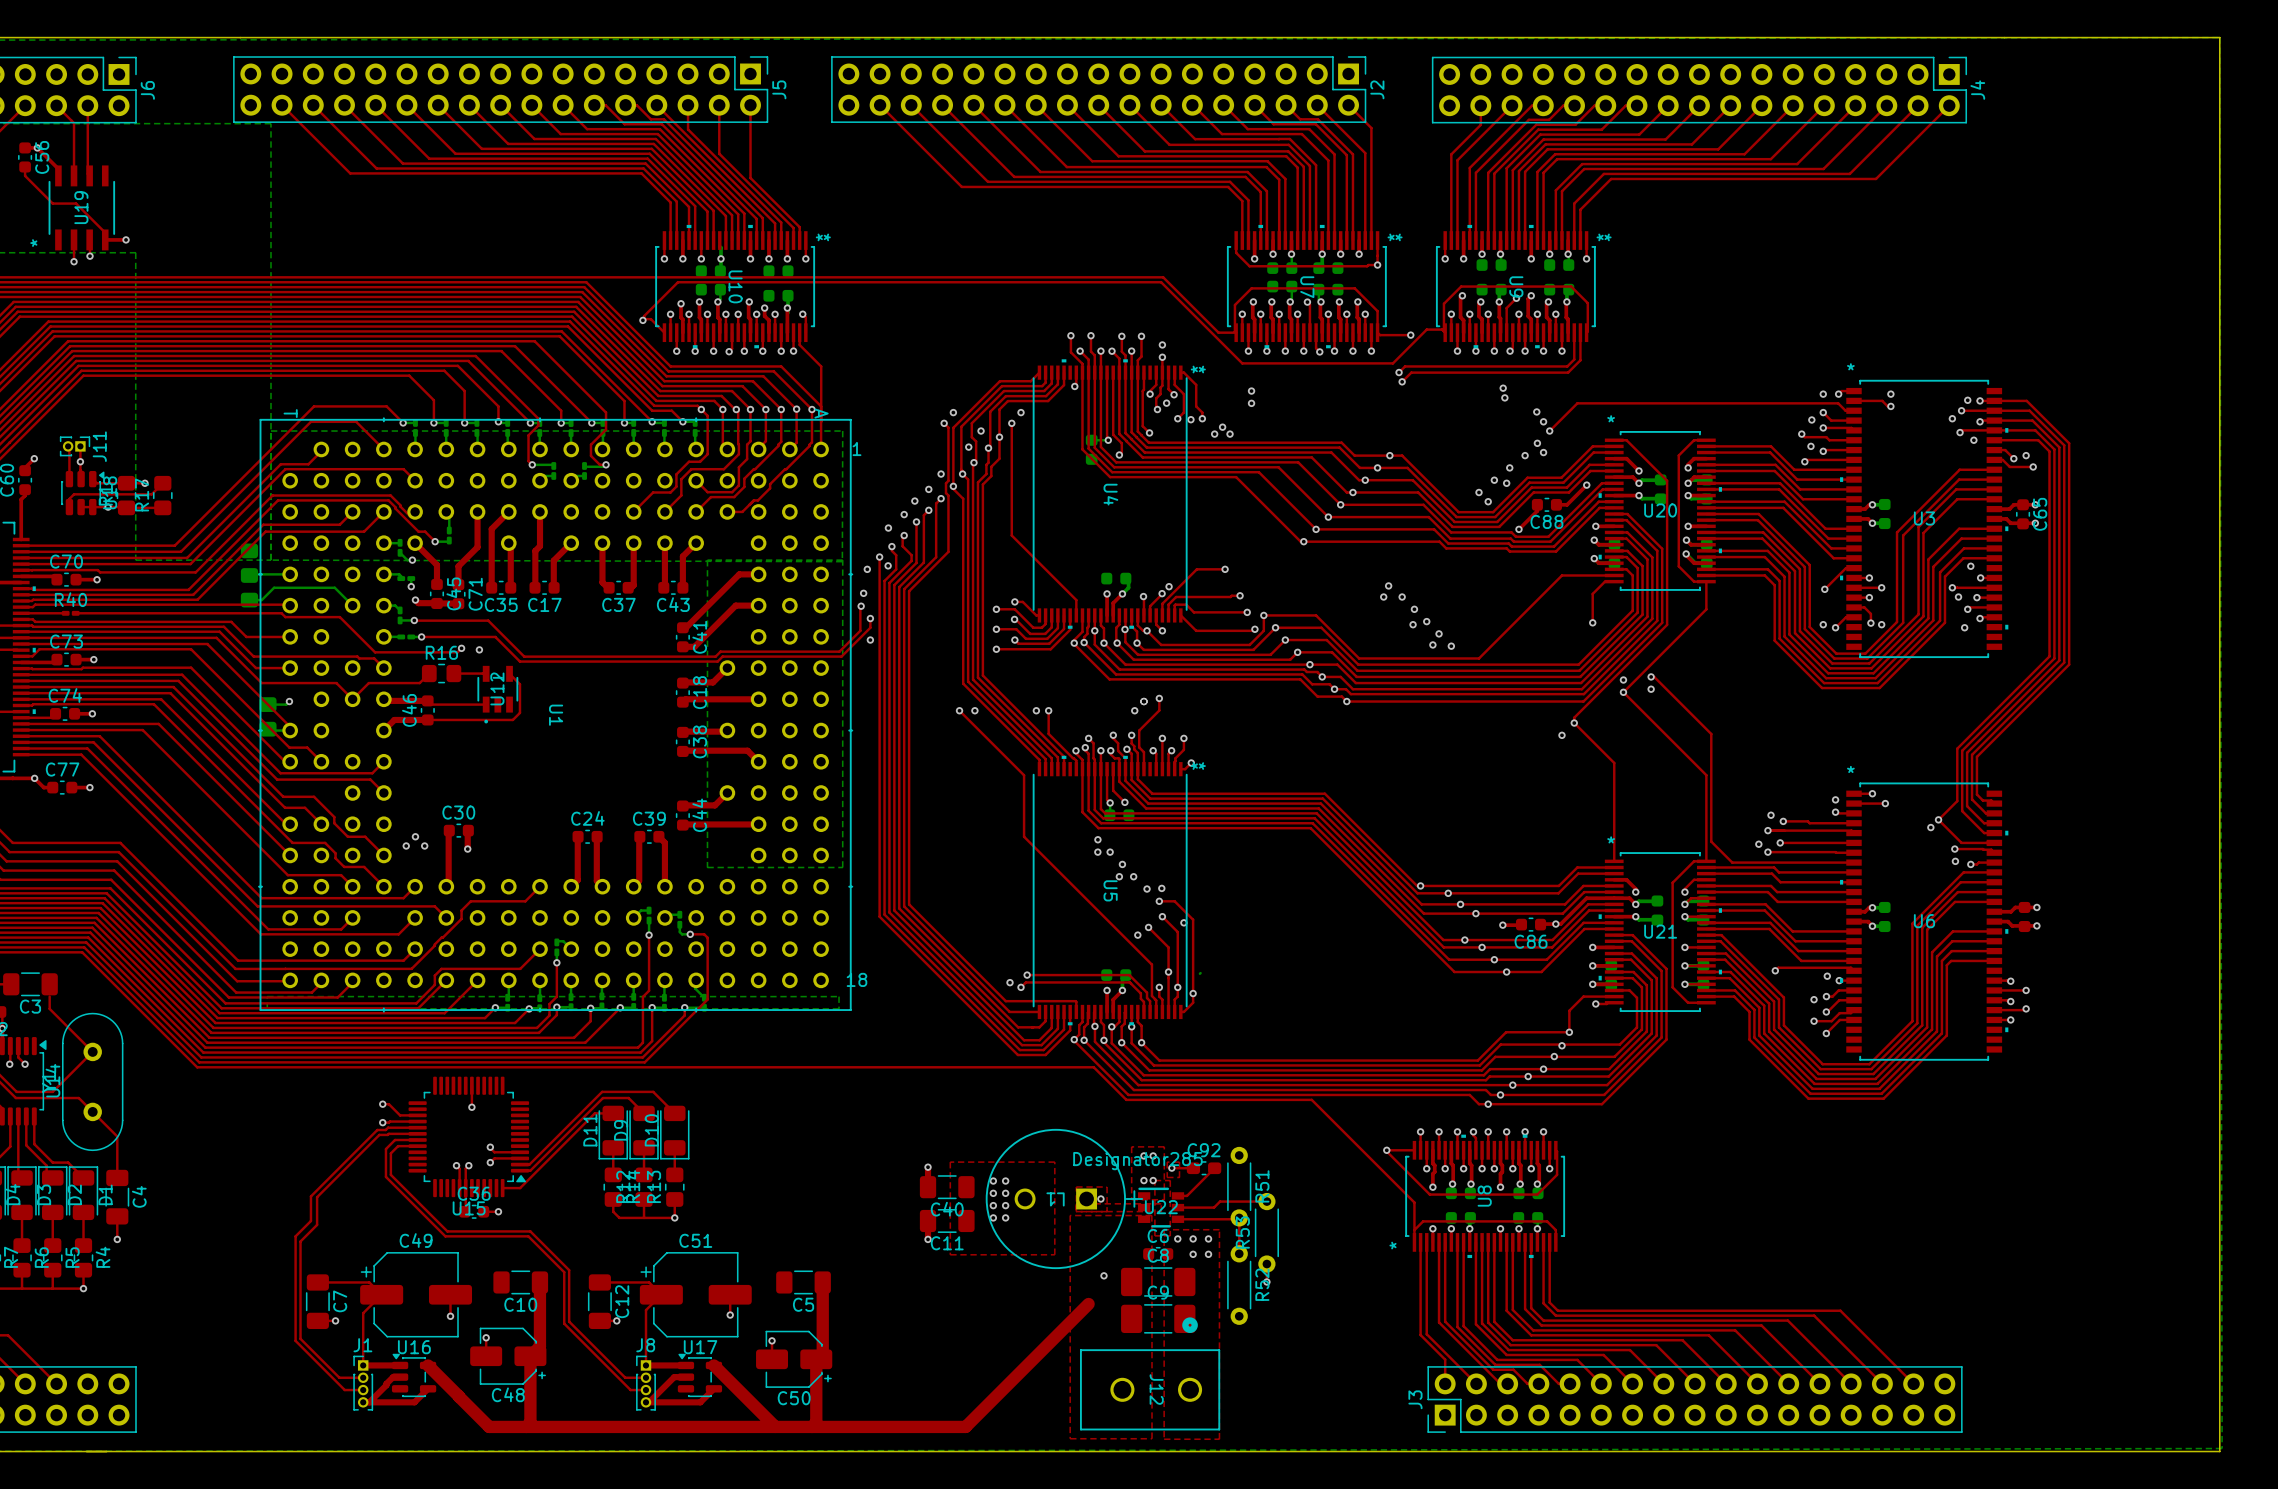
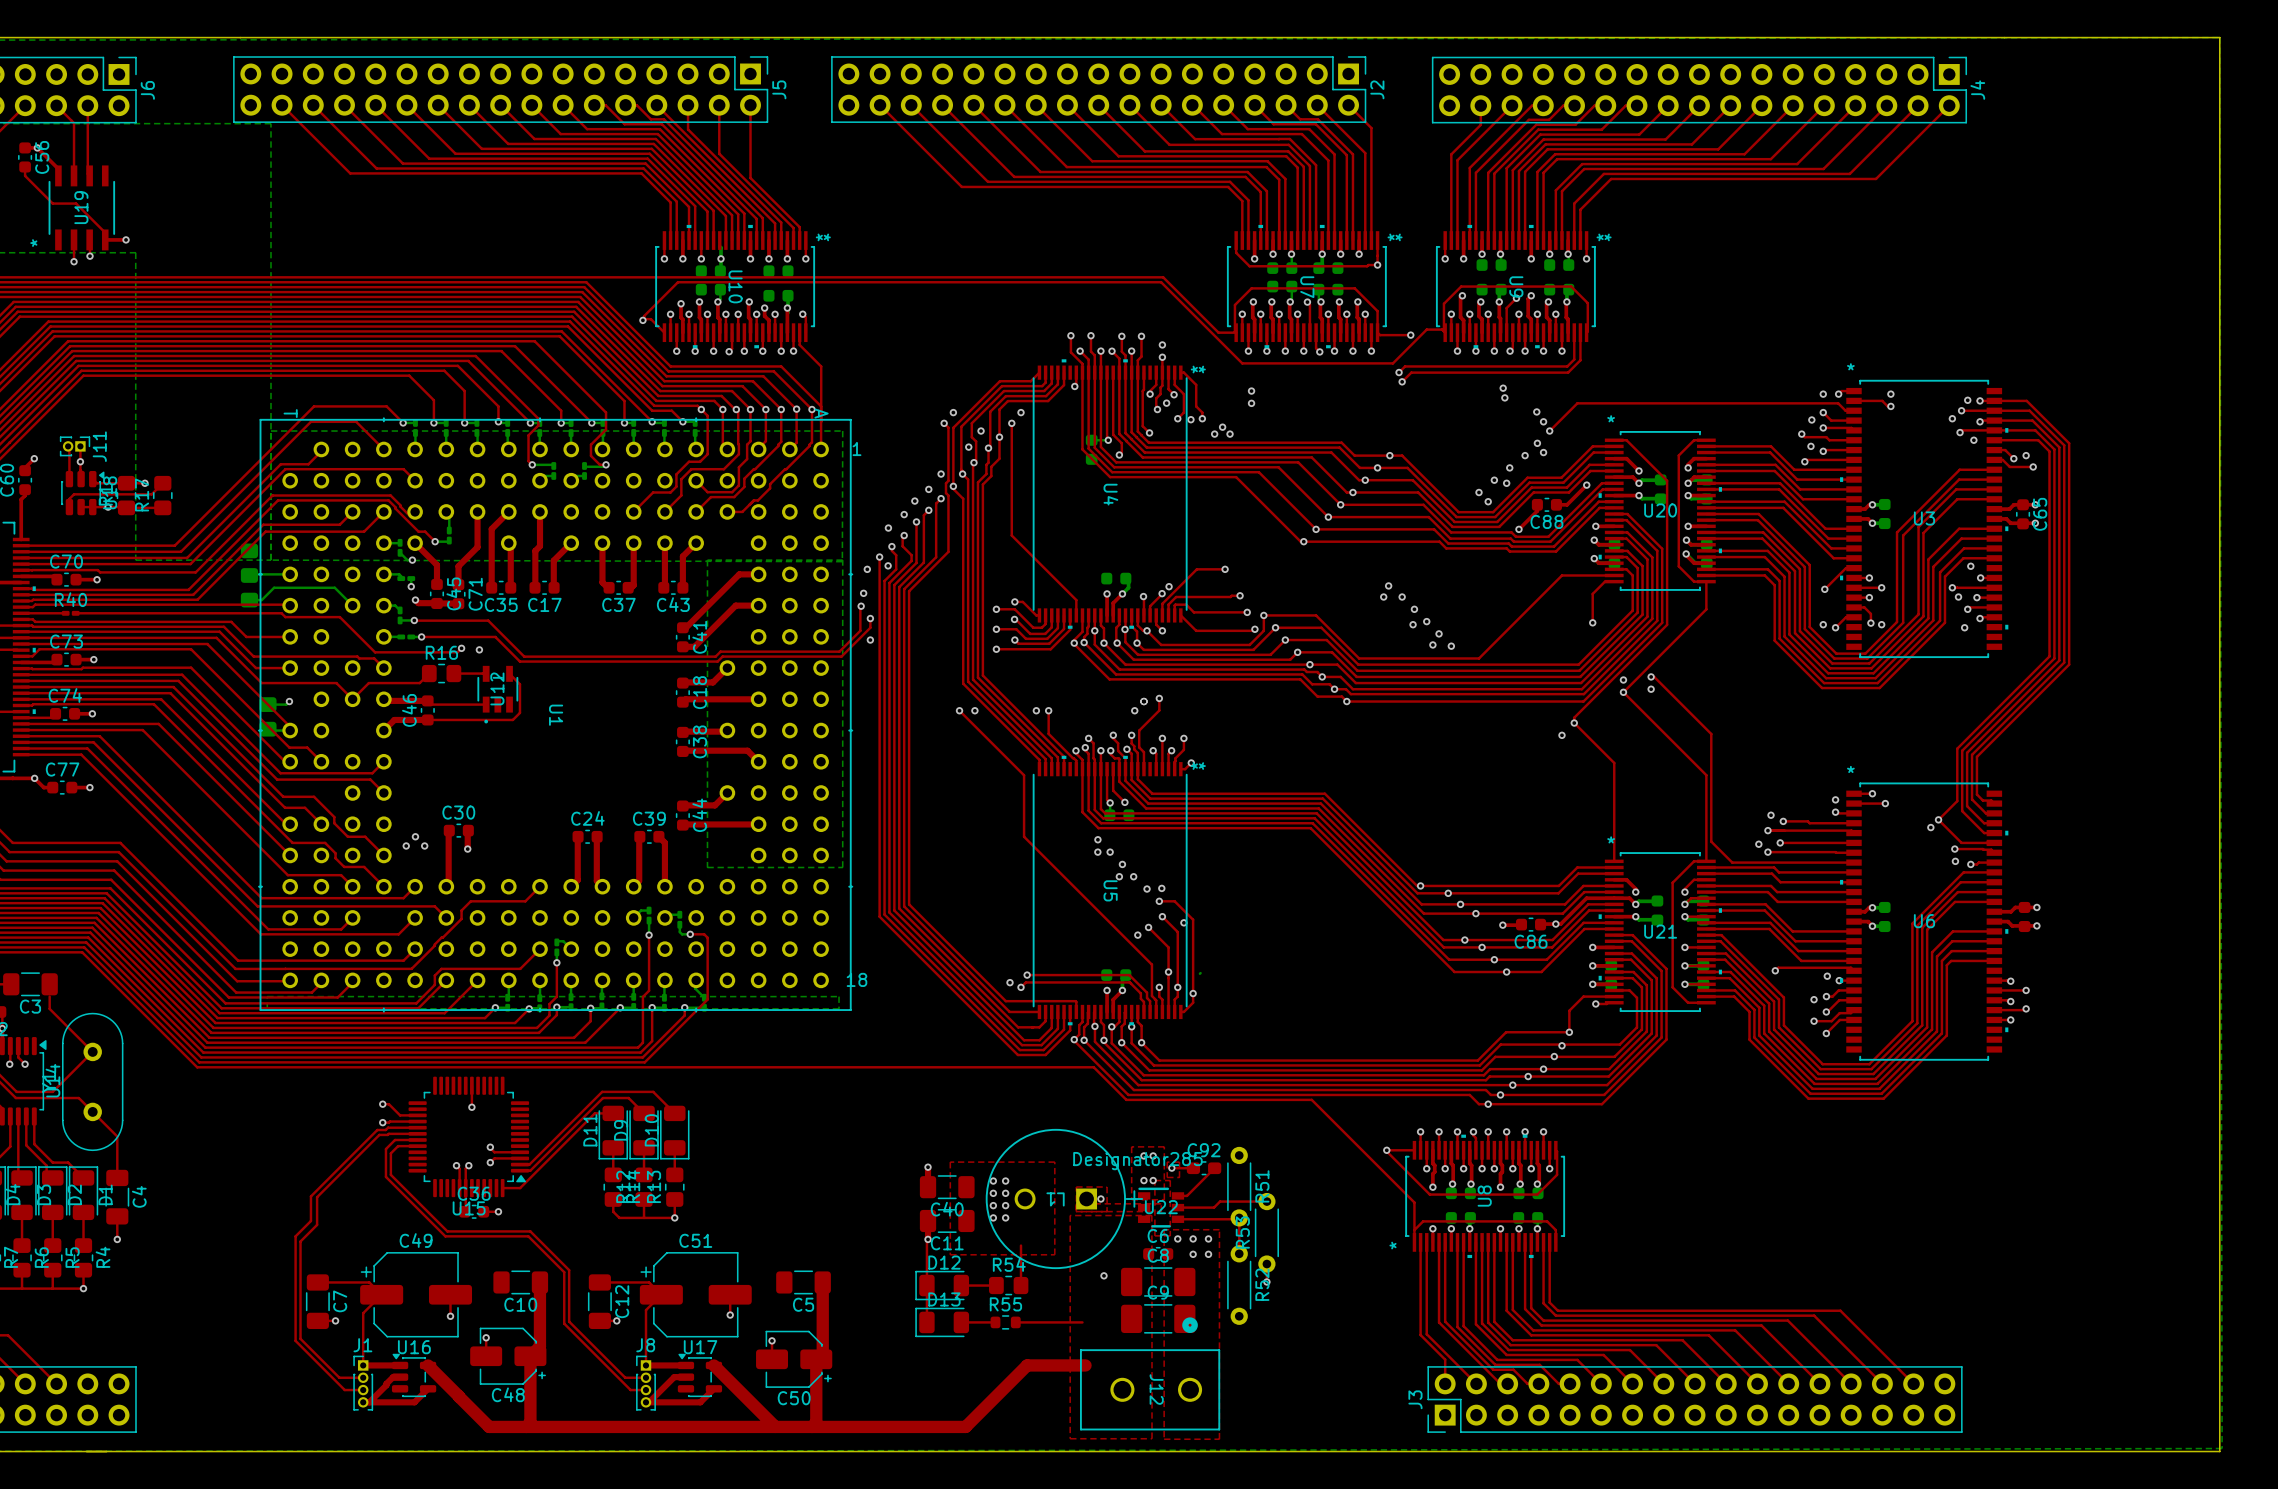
top track: none -> (928, 1239) (926, 1322)
top track: none -> (1021, 1245) (1021, 1285)
D12: none -> (942, 1285)
top track: none -> (961, 1285) (996, 1285)
R54: none -> (1008, 1285)
top track: (1088, 1303) (1027, 1365) -> (1085, 1365) (1027, 1365)
D13: none -> (942, 1322)
top track: none -> (961, 1322) (995, 1322)
R55: none -> (1005, 1322)
top track: none -> (1015, 1322) (1082, 1322)

